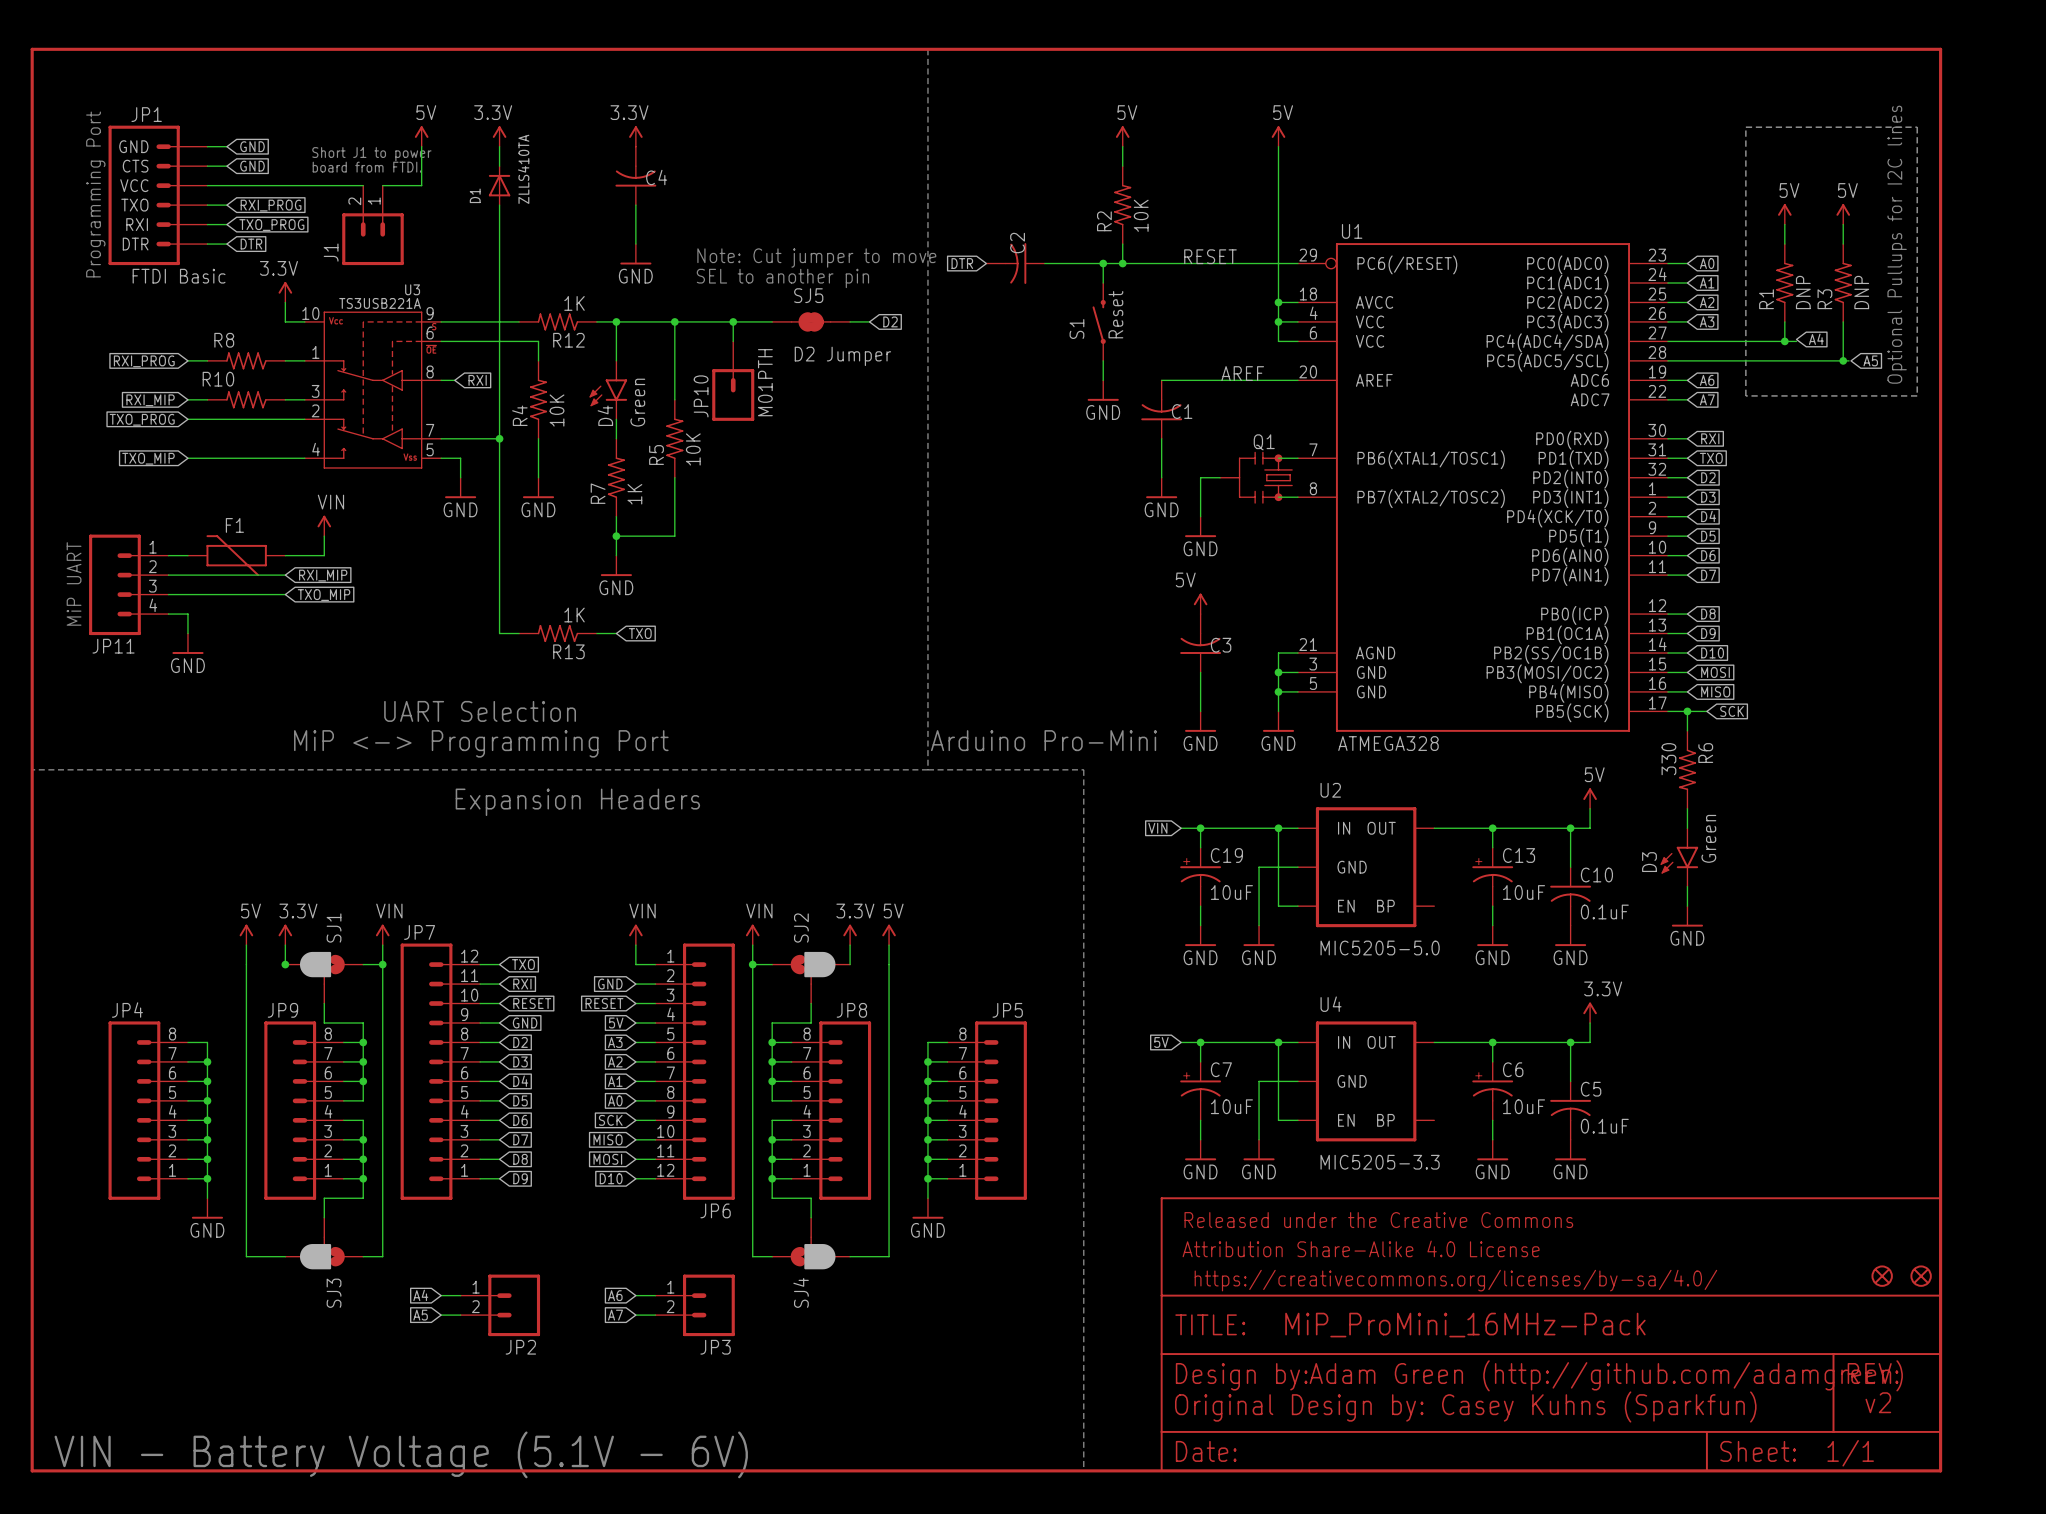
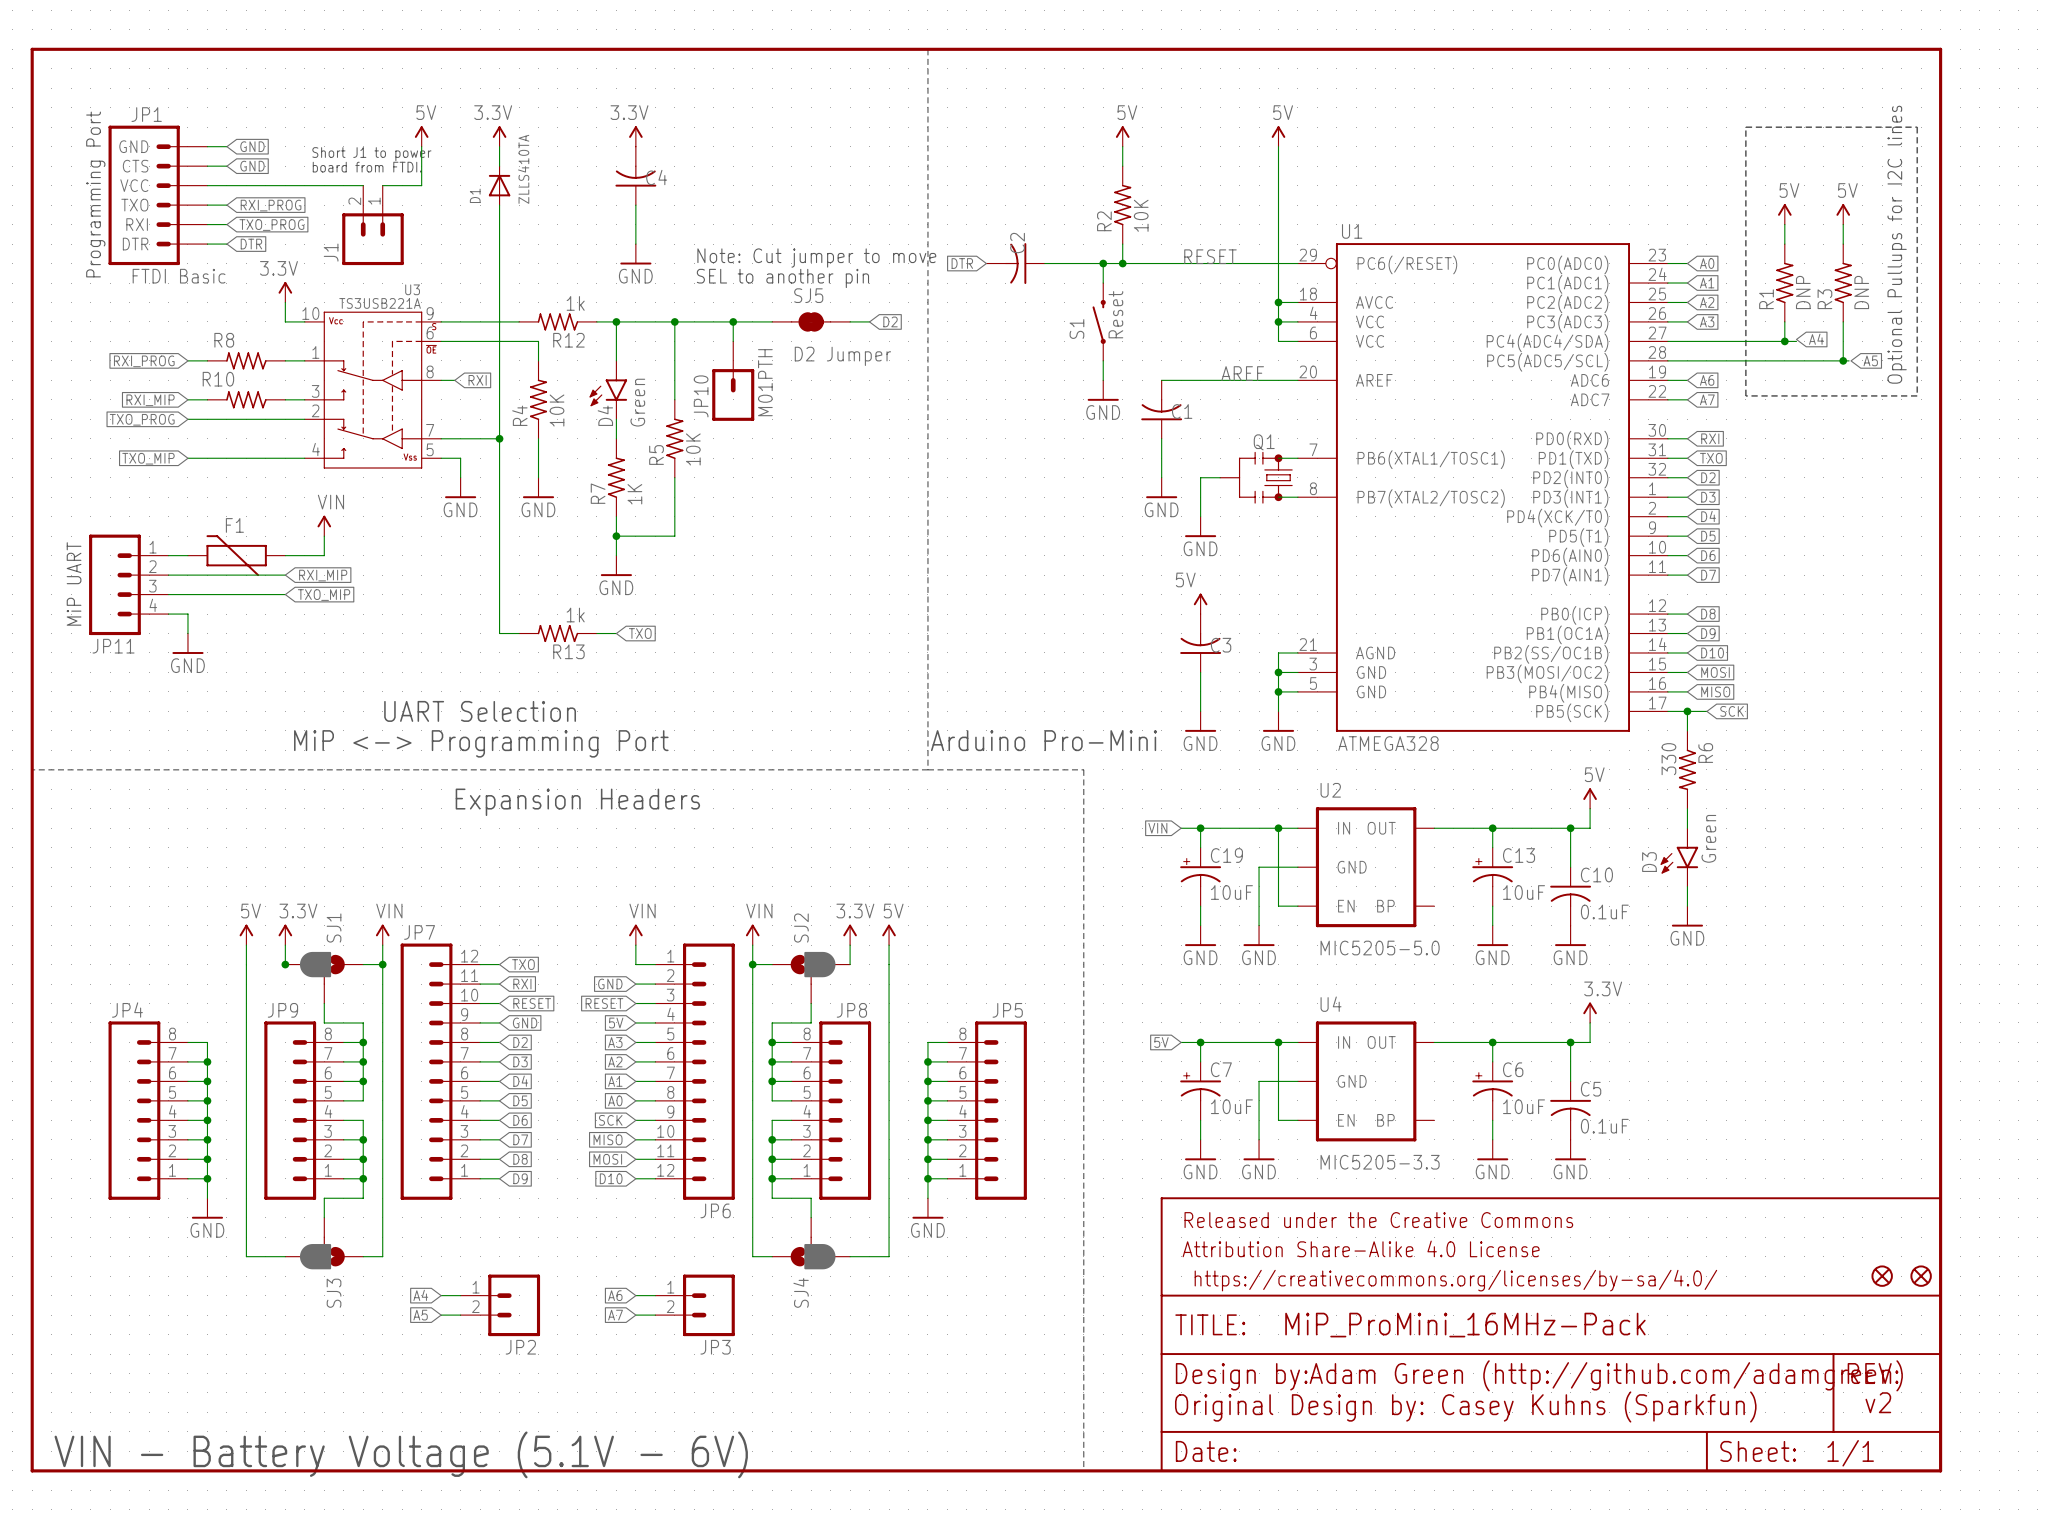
R12 value: 1K (574, 303) -> 1k (575, 303)
R13 value: 1K (574, 615) -> 1k (575, 615)

